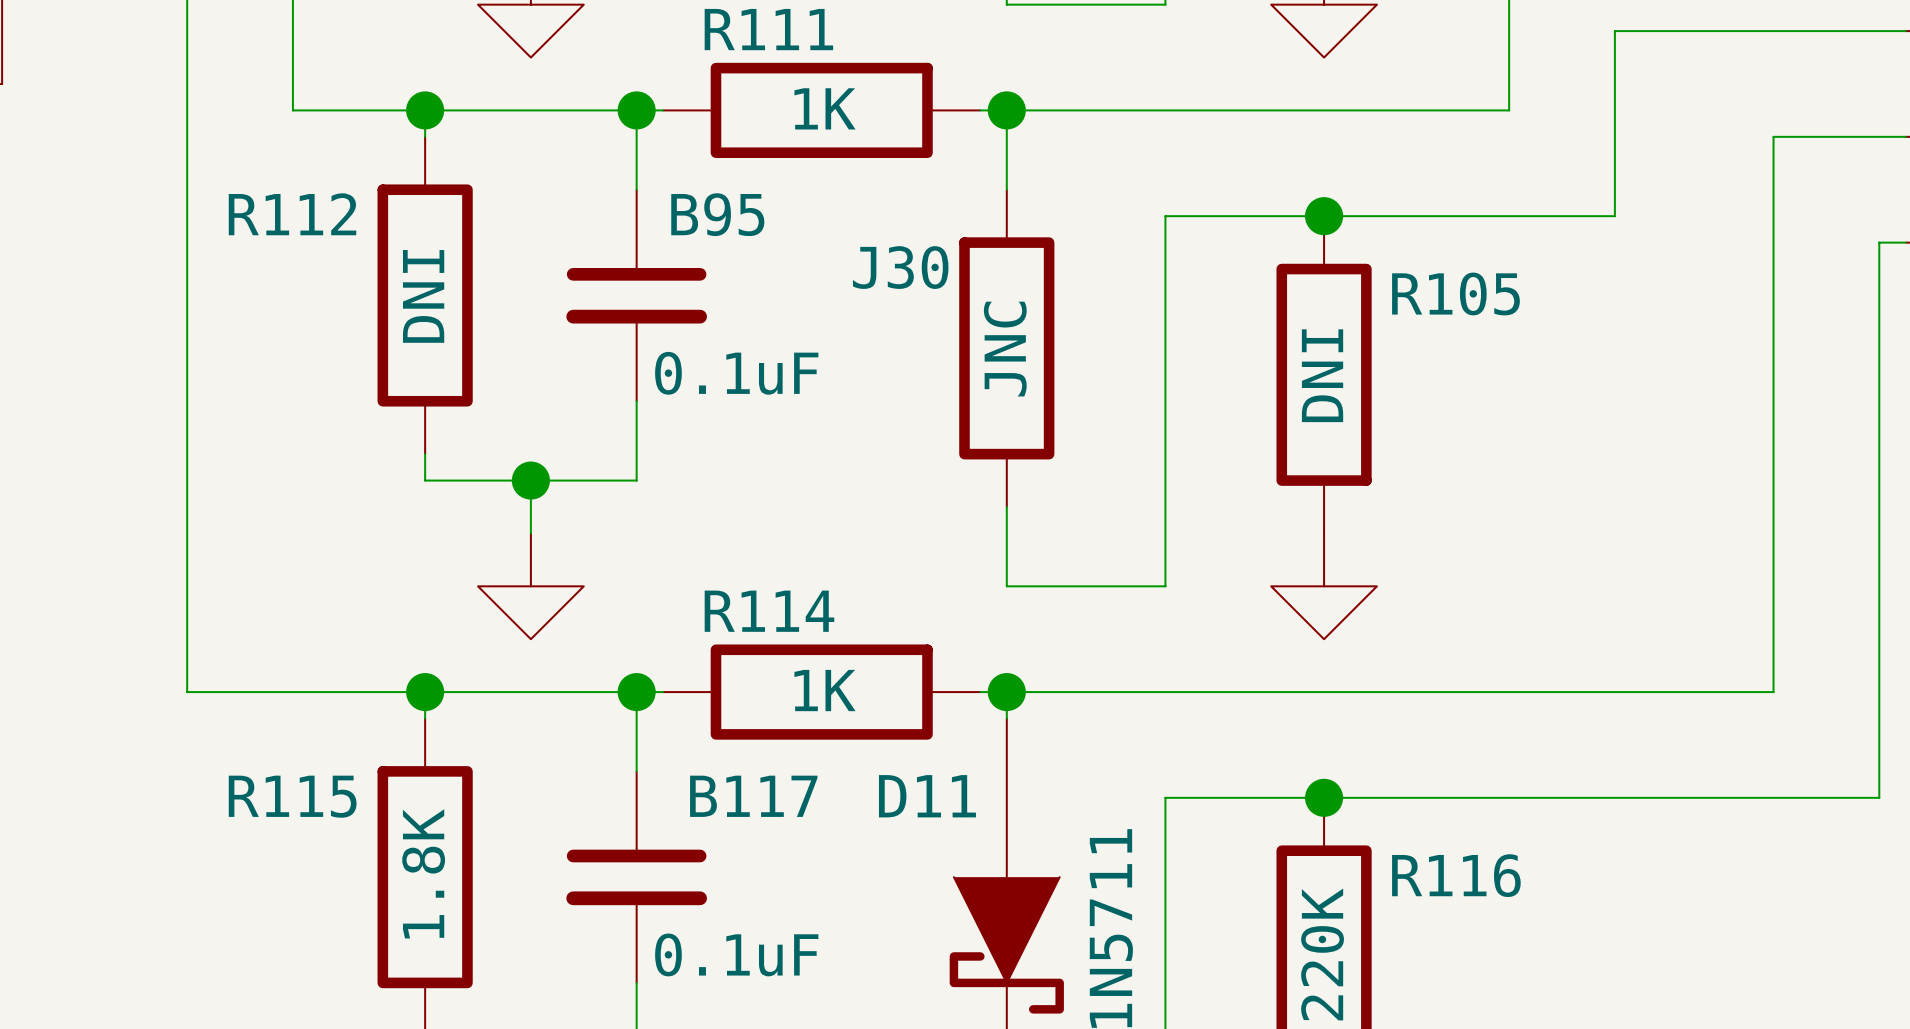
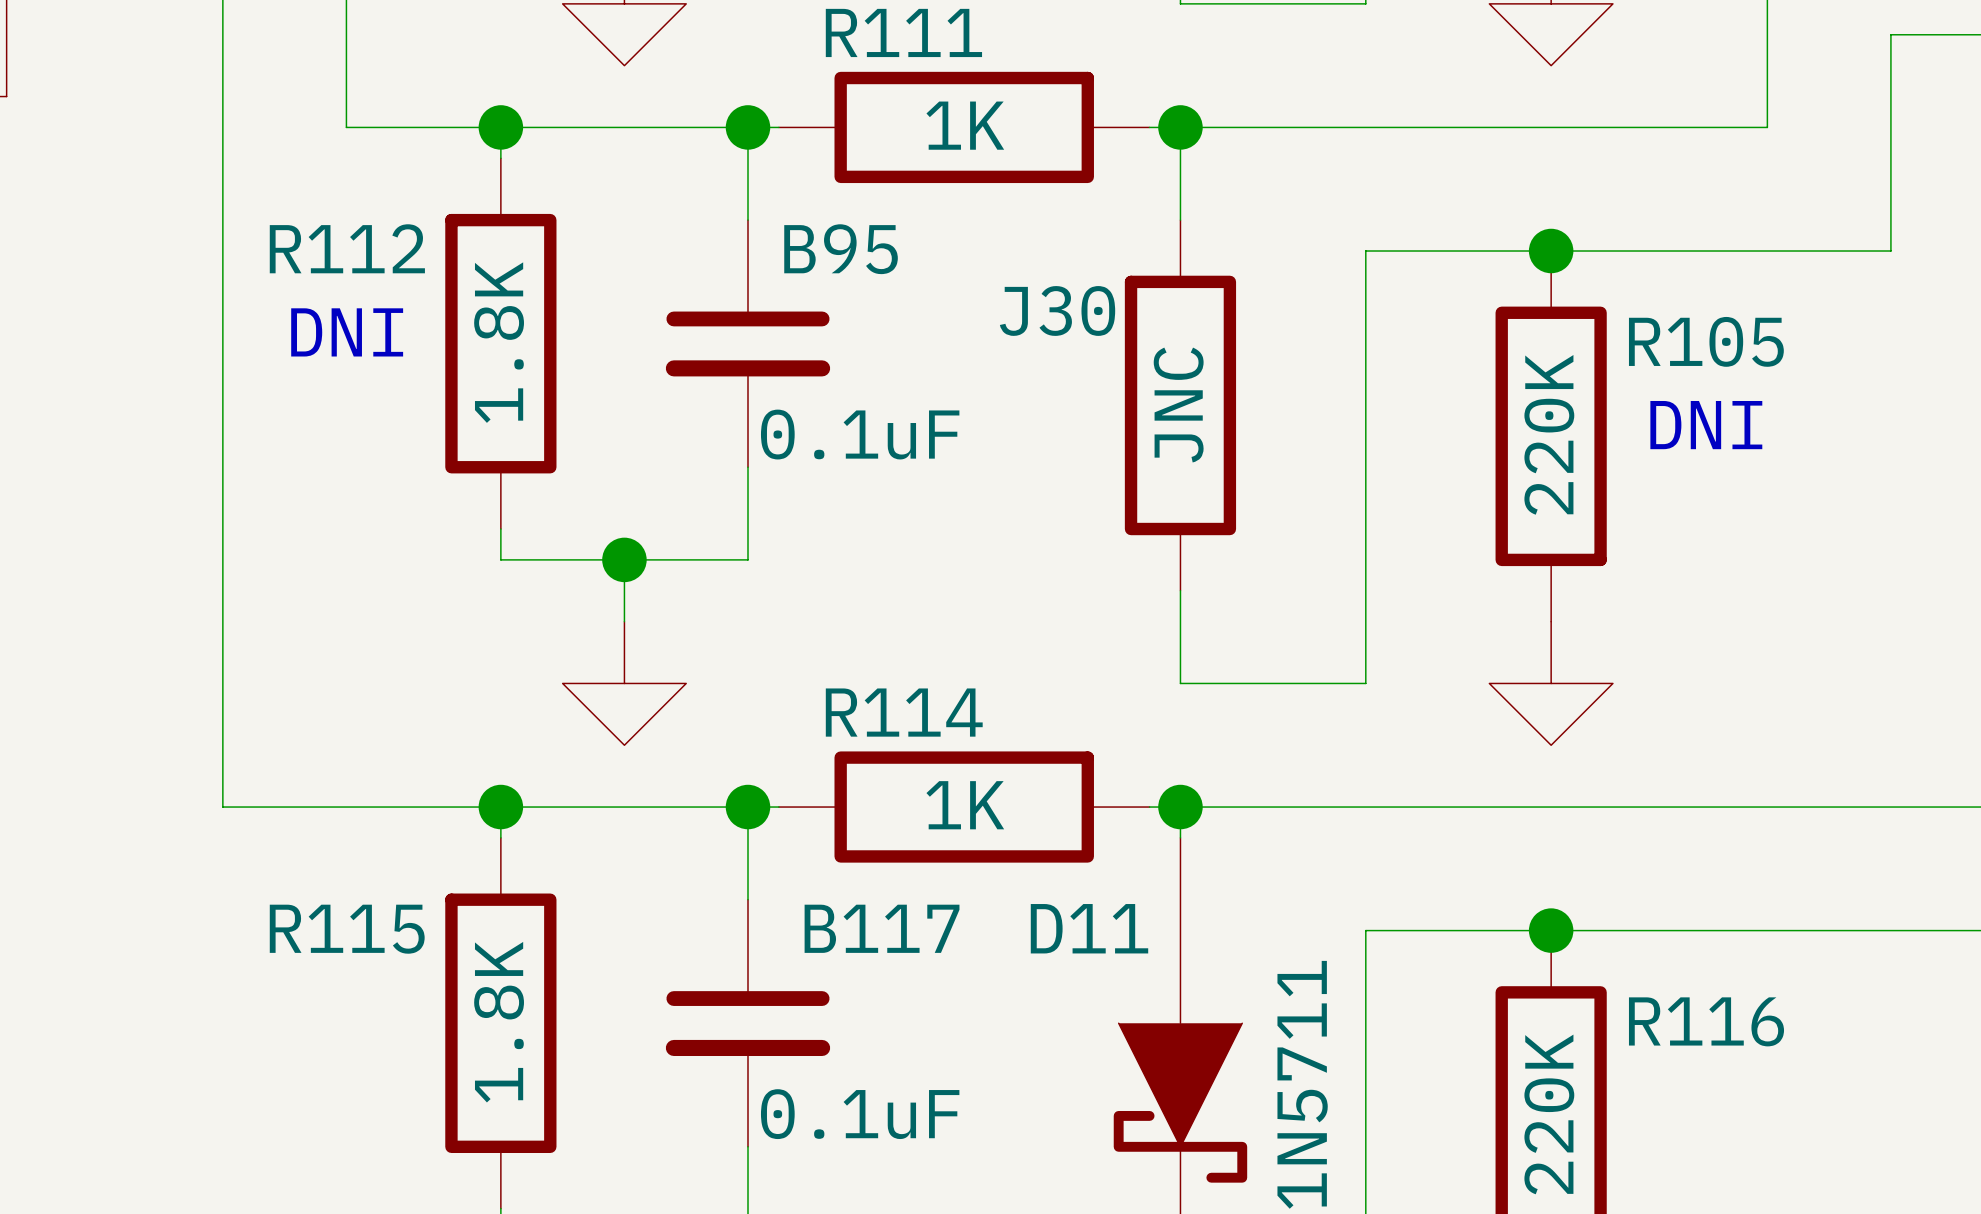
text: none -> DNI (347, 332)
R112 value: DNI (423, 296) -> 1.8K (499, 342)
text: none -> DNI (1706, 425)
R105 value: DNI (1322, 375) -> 220K (1549, 434)

